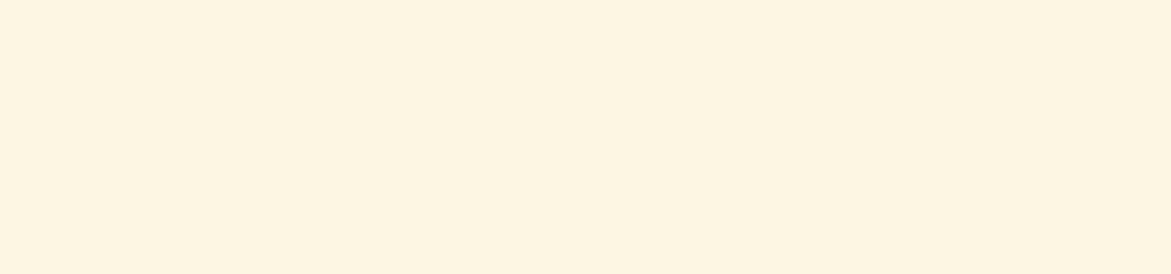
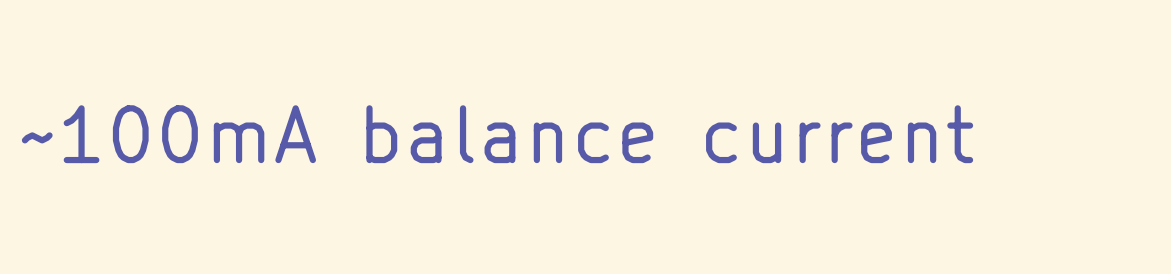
text: none -> ~100mA balance current (497, 134)

